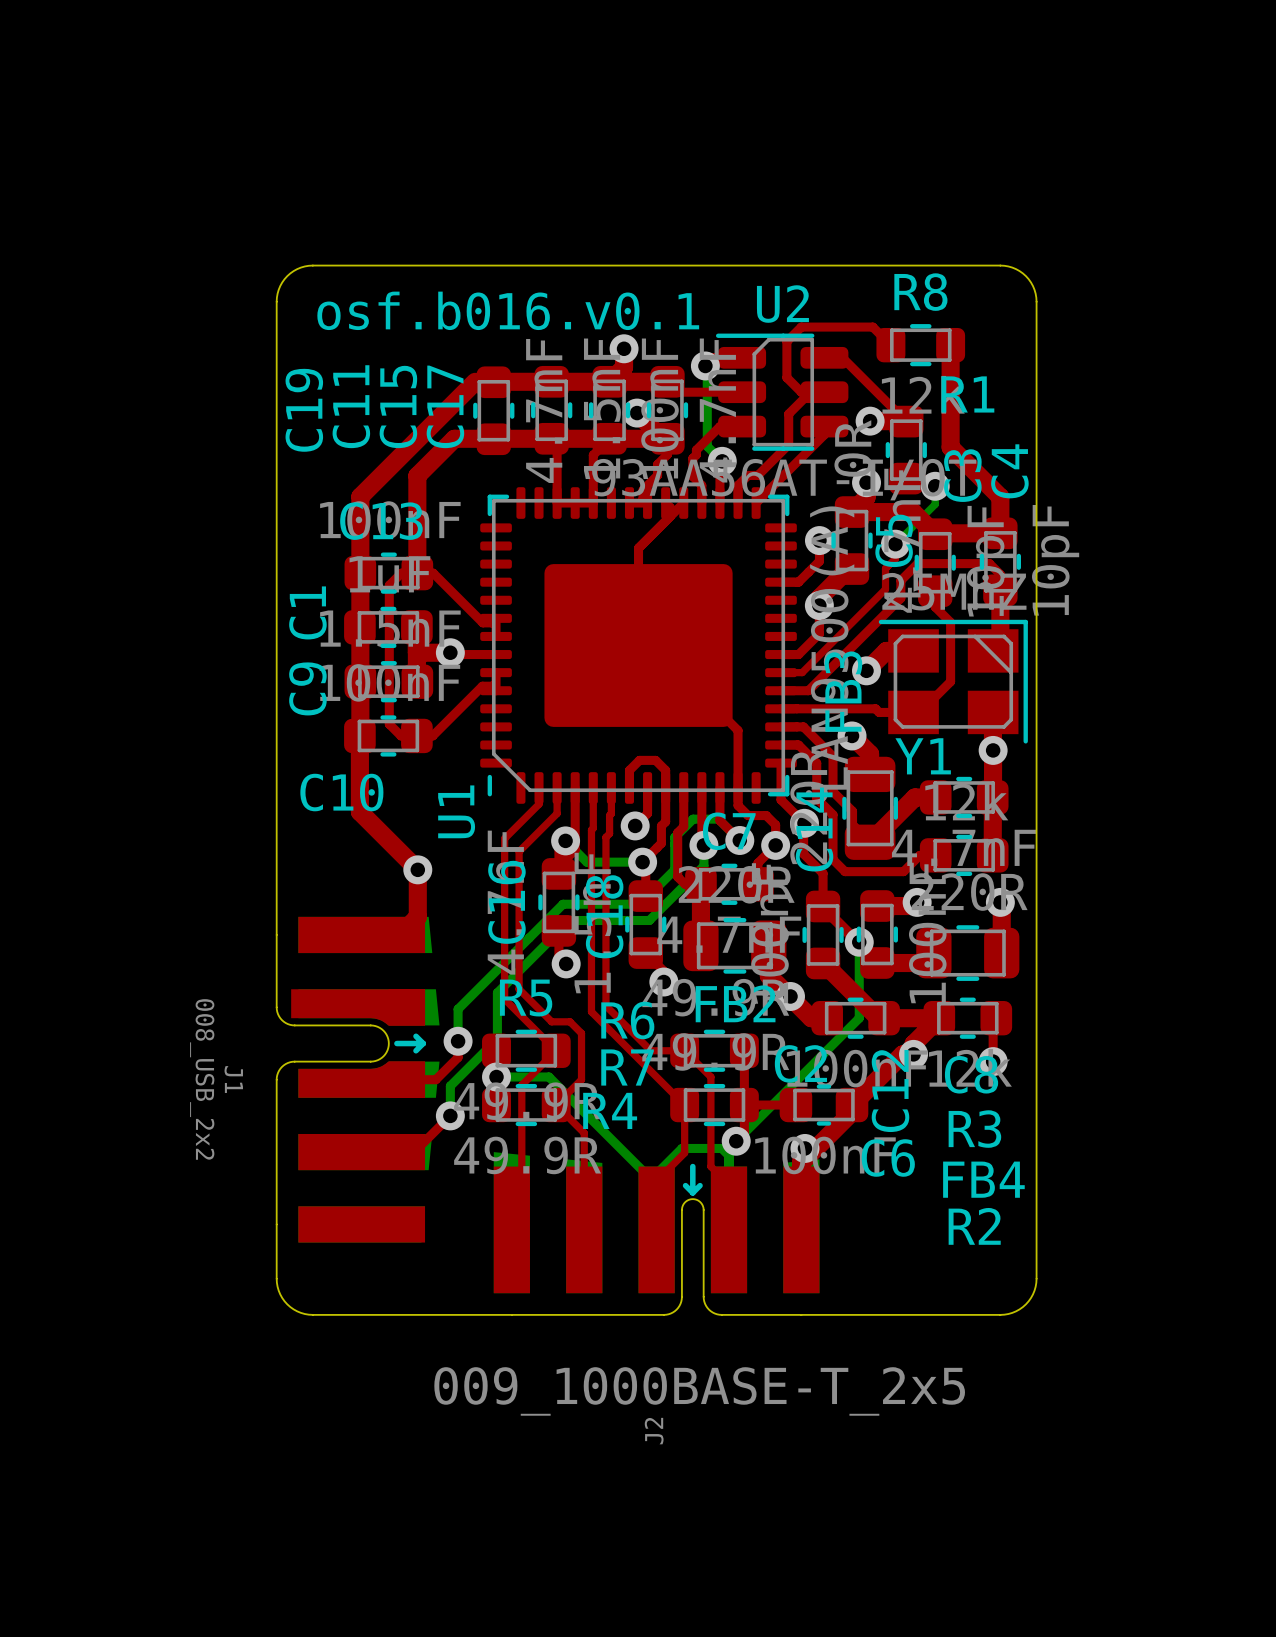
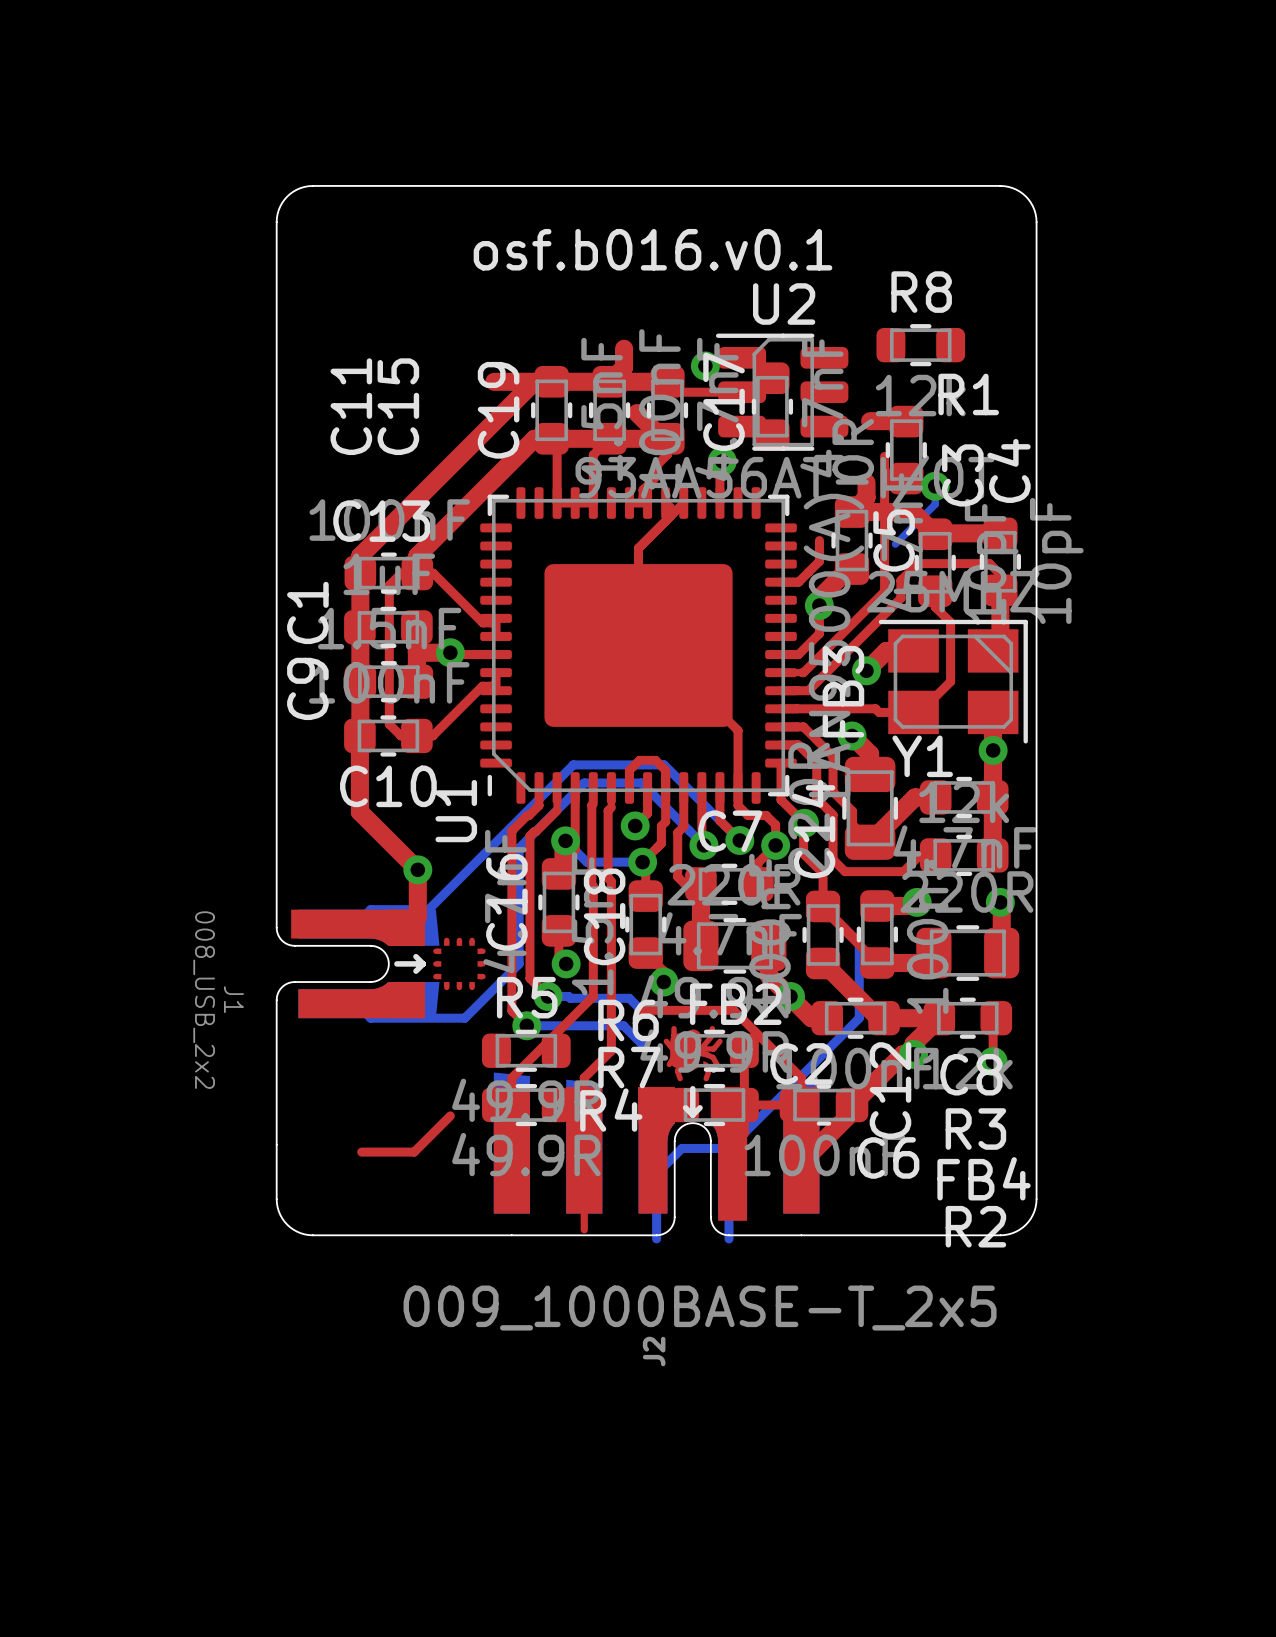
board edge: (276, 301) (280, 286) (287, 276) (297, 269) (312, 265) (1000, 265) (1016, 269) (1025, 276) (1032, 286) (1036, 301) -> (276, 301) (276, 222) (278, 210) (284, 199) (293, 191) (312, 185) (1004, 186) (1022, 193) (1031, 202) (1035, 214) (1036, 301)
text position: osf.b016.v0.1 (508, 310) -> osf.b016.v0.1 (653, 249)
top track: (890, 345) (872, 327) (801, 327) (786, 341) (786, 377) (801, 392) (824, 392) -> none
top track: (950, 345) (950, 447) (1000, 497) (1000, 533) -> none
via: (624, 348) -> none
top track: (824, 357) (842, 357) (906, 421) -> none
bottom track: (705, 365) (707, 367) (707, 446) (722, 461) -> none
top track: (475, 381) (360, 496) (360, 555) -> (534, 381) (360, 555)
top track: (810, 392) (788, 414) (788, 444) (757, 475) (748, 475) (738, 485) (738, 503) -> none
C19 name position: C19 (304, 410) -> C19 (498, 410)
C17 position: (493, 410) -> (772, 406)
via: (637, 413) -> none
via: (870, 421) -> none
top track: (742, 426) (719, 426) (696, 450) (696, 454) (692, 458) (692, 476) (701, 485) (701, 503) -> none
top track: (824, 426) (824, 434) (756, 503) -> none
top track: (534, 438) (454, 438) (417, 475) (417, 555) -> (534, 438) (417, 555)
via: (866, 482) -> none
via: (819, 540) -> none
top track: (895, 544) (895, 558) (885, 568) (885, 589) (802, 672) -> (884, 456) (884, 591) (802, 672)
via: (895, 544) -> none
C10 name position: C10 (341, 792) -> C10 (388, 786)
top track: (593, 803) (593, 828) (591, 830) (591, 1011) (684, 1105) (684, 1152) (656, 1181) (656, 1184) -> (593, 803) (593, 996) (511, 1077) (511, 1150)
top track: (539, 804) (504, 838) (504, 999) (556, 1050) (521, 1085) (521, 1219) (511, 1229) -> (539, 804) (511, 830) (511, 1010) (526, 1025)
top track: (611, 807) (609, 833) (605, 837) (605, 1005) (650, 1050) (684, 1050) (710, 1077) (710, 1166) (728, 1184) -> none
top track: (557, 810) (557, 813) (519, 851) (519, 989) (551, 1021) (570, 1021) (581, 1033) (581, 1079) (556, 1105) (584, 1133) -> (611, 807) (608, 810) (608, 878) (611, 881) (611, 1050) (584, 1077) (584, 1133)
top track: none -> (557, 810) (529, 835) (529, 978) (548, 996)
bottom track: (718, 819) (693, 819) (674, 837) (674, 869) (640, 904) (563, 904) (458, 1009) (458, 1041) -> (718, 819) (664, 764) (573, 764) (428, 909) (370, 909) (352, 927)
bottom track: (703, 845) (703, 865) (649, 920) (569, 920) (497, 992) (497, 1039) (450, 1086) (450, 1115) -> (703, 845) (641, 783) (584, 783) (519, 848) (519, 963) (464, 1018) (370, 1018) (352, 1000)
J1 footprint: [275, 916, 440, 1243] -> [275, 909, 486, 1019]
board edge: (276, 927) (276, 934) -> none
via: (859, 942) -> none
bottom track: none -> (548, 996) (629, 998) (641, 1010)
via: none -> (548, 996)
board edge: none -> (276, 1000) (276, 1199) (278, 1211) (287, 1224) (297, 1231) (312, 1235) (511, 1235)
top track: none -> (641, 1010) (733, 1010) (801, 1077) (801, 1150)
bottom track: none -> (526, 1025) (623, 1025) (642, 1044)
via: none -> (526, 1025)
top track: (458, 1041) (458, 1057) (435, 1079) (406, 1079) -> none
via: (458, 1041) -> none
bottom track: (496, 1077) (548, 1077) (656, 1184) -> none
via: (496, 1077) -> none
via: (450, 1115) -> none
via: (736, 1141) -> none
via: (804, 1148) -> none
J2 footprint: [493, 1152, 820, 1316] -> [493, 1025, 820, 1237]
board edge: (1036, 1199) (1035, 1286) (1028, 1301) (1016, 1311) (1000, 1314) (801, 1314) -> (1036, 1199) (1034, 1211) (1028, 1221) (1019, 1229) (1004, 1235) (801, 1235)
board edge: (276, 1224) (277, 1286) (284, 1301) (300, 1312) (312, 1314) (511, 1314) -> none

